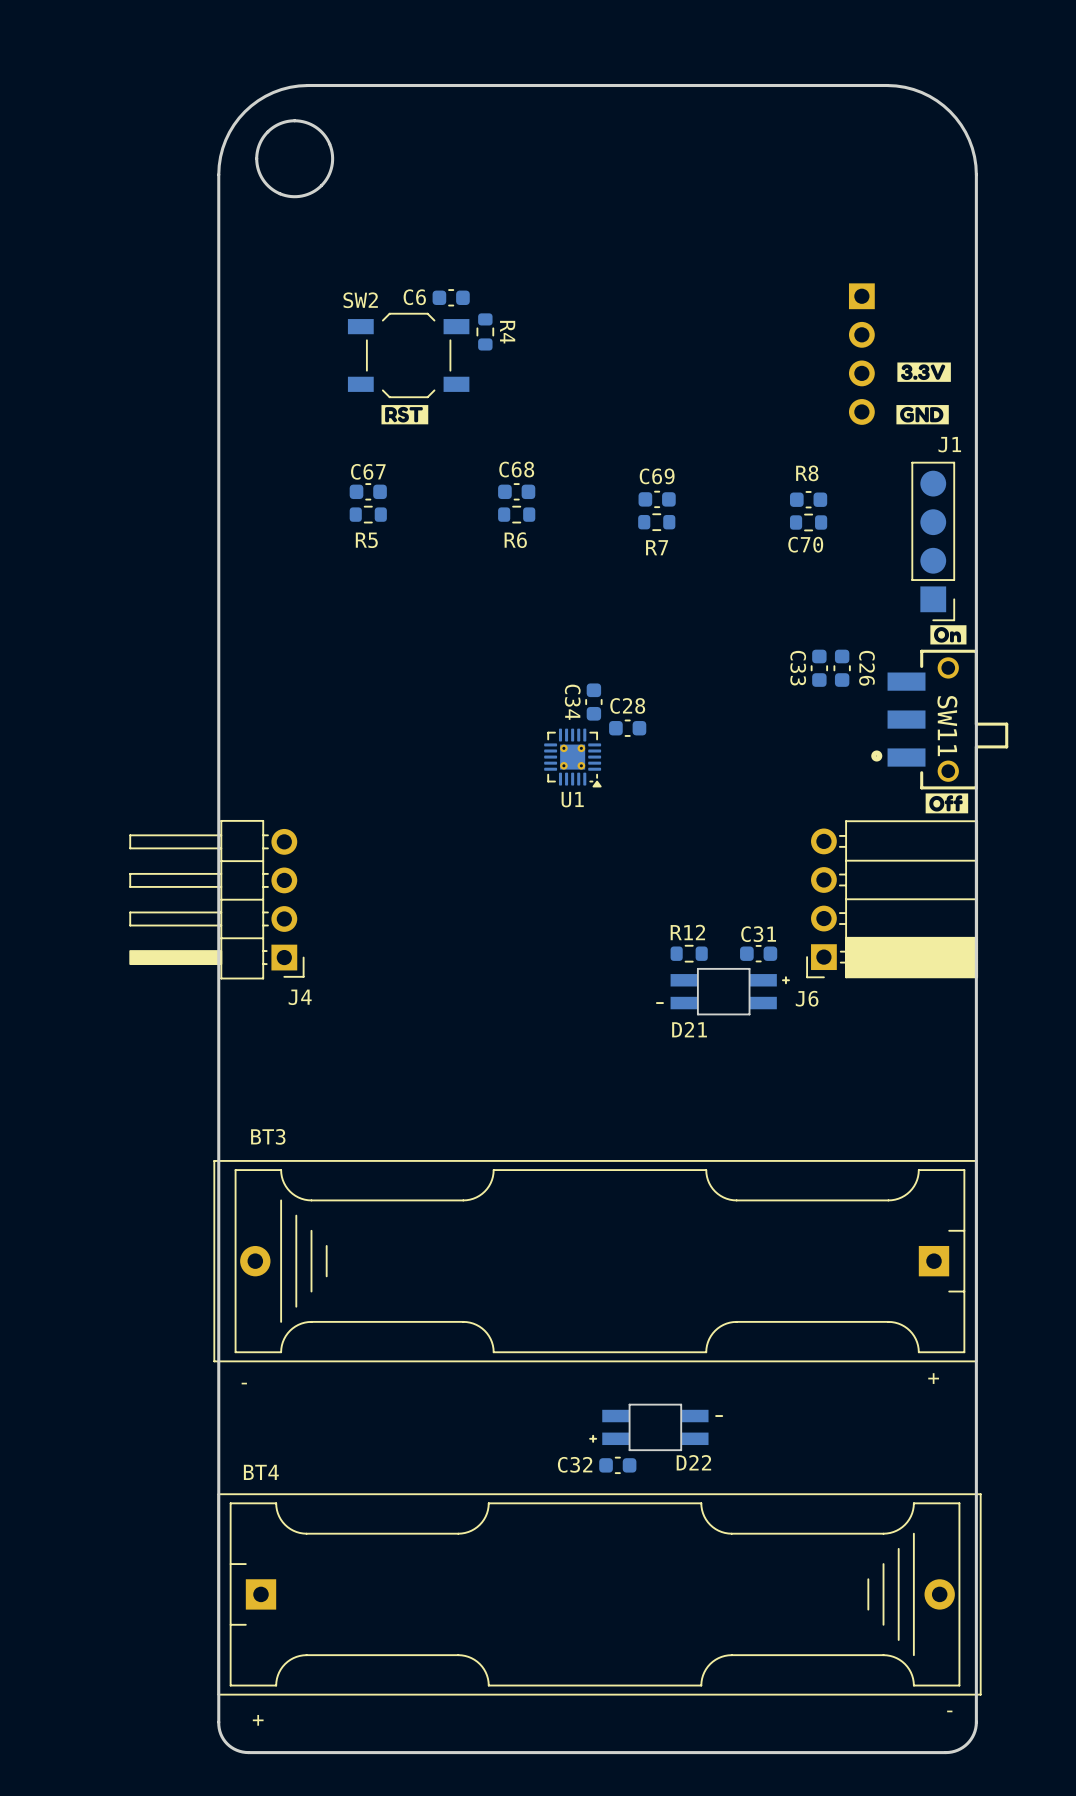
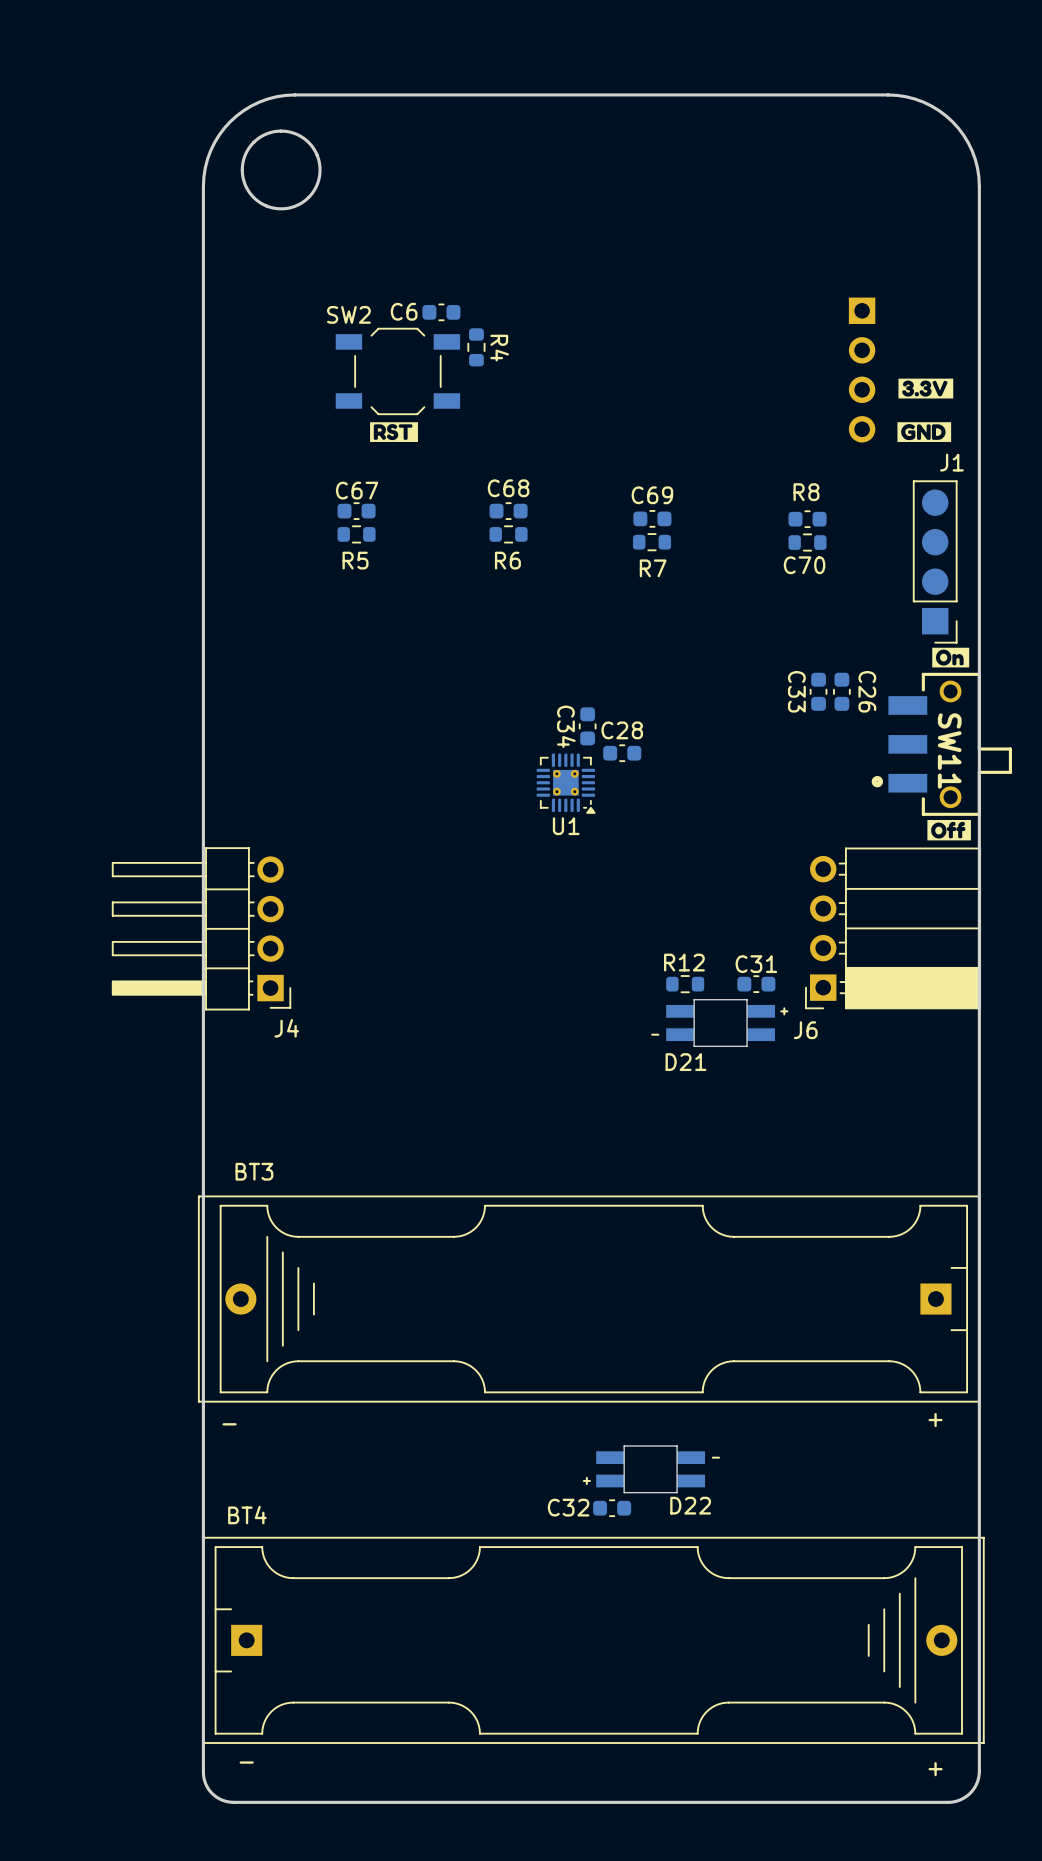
BT4 text position: - (949, 1711) -> - (246, 1762)
BT4 text position: + (258, 1720) -> + (935, 1769)

